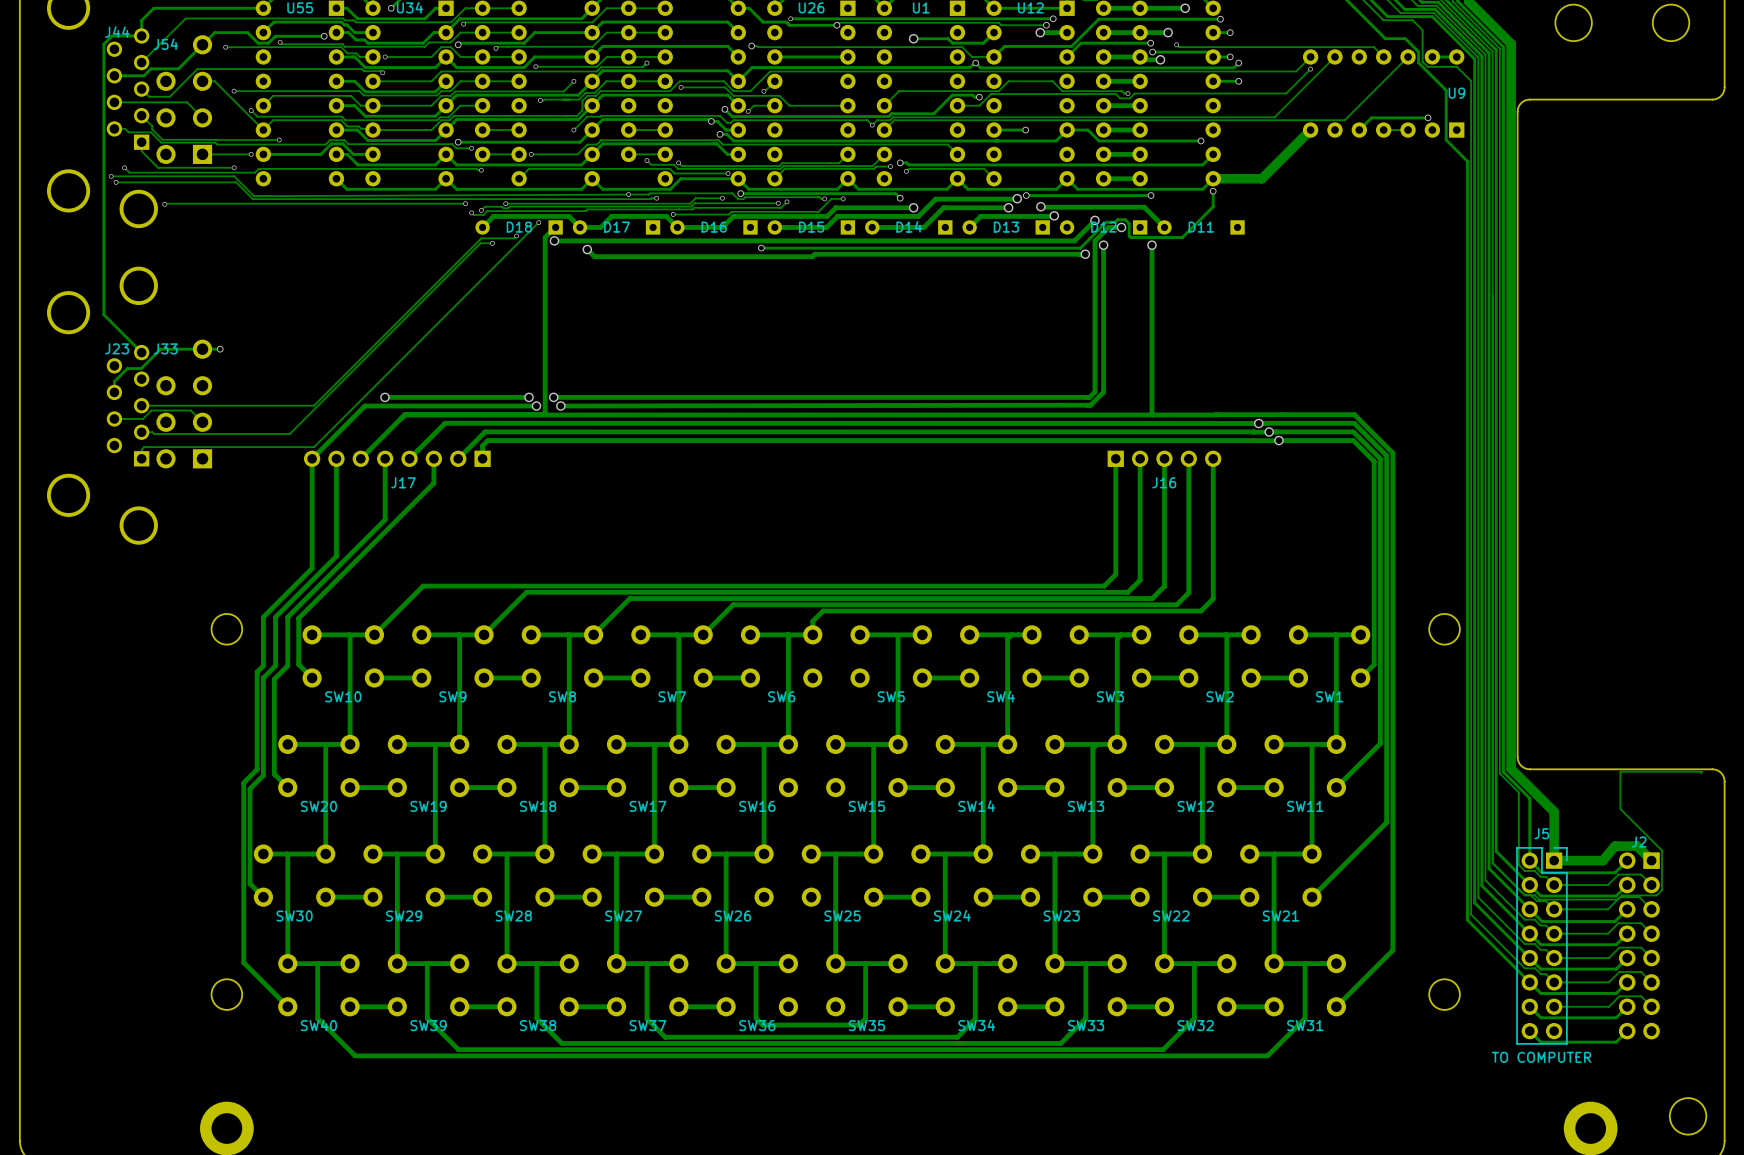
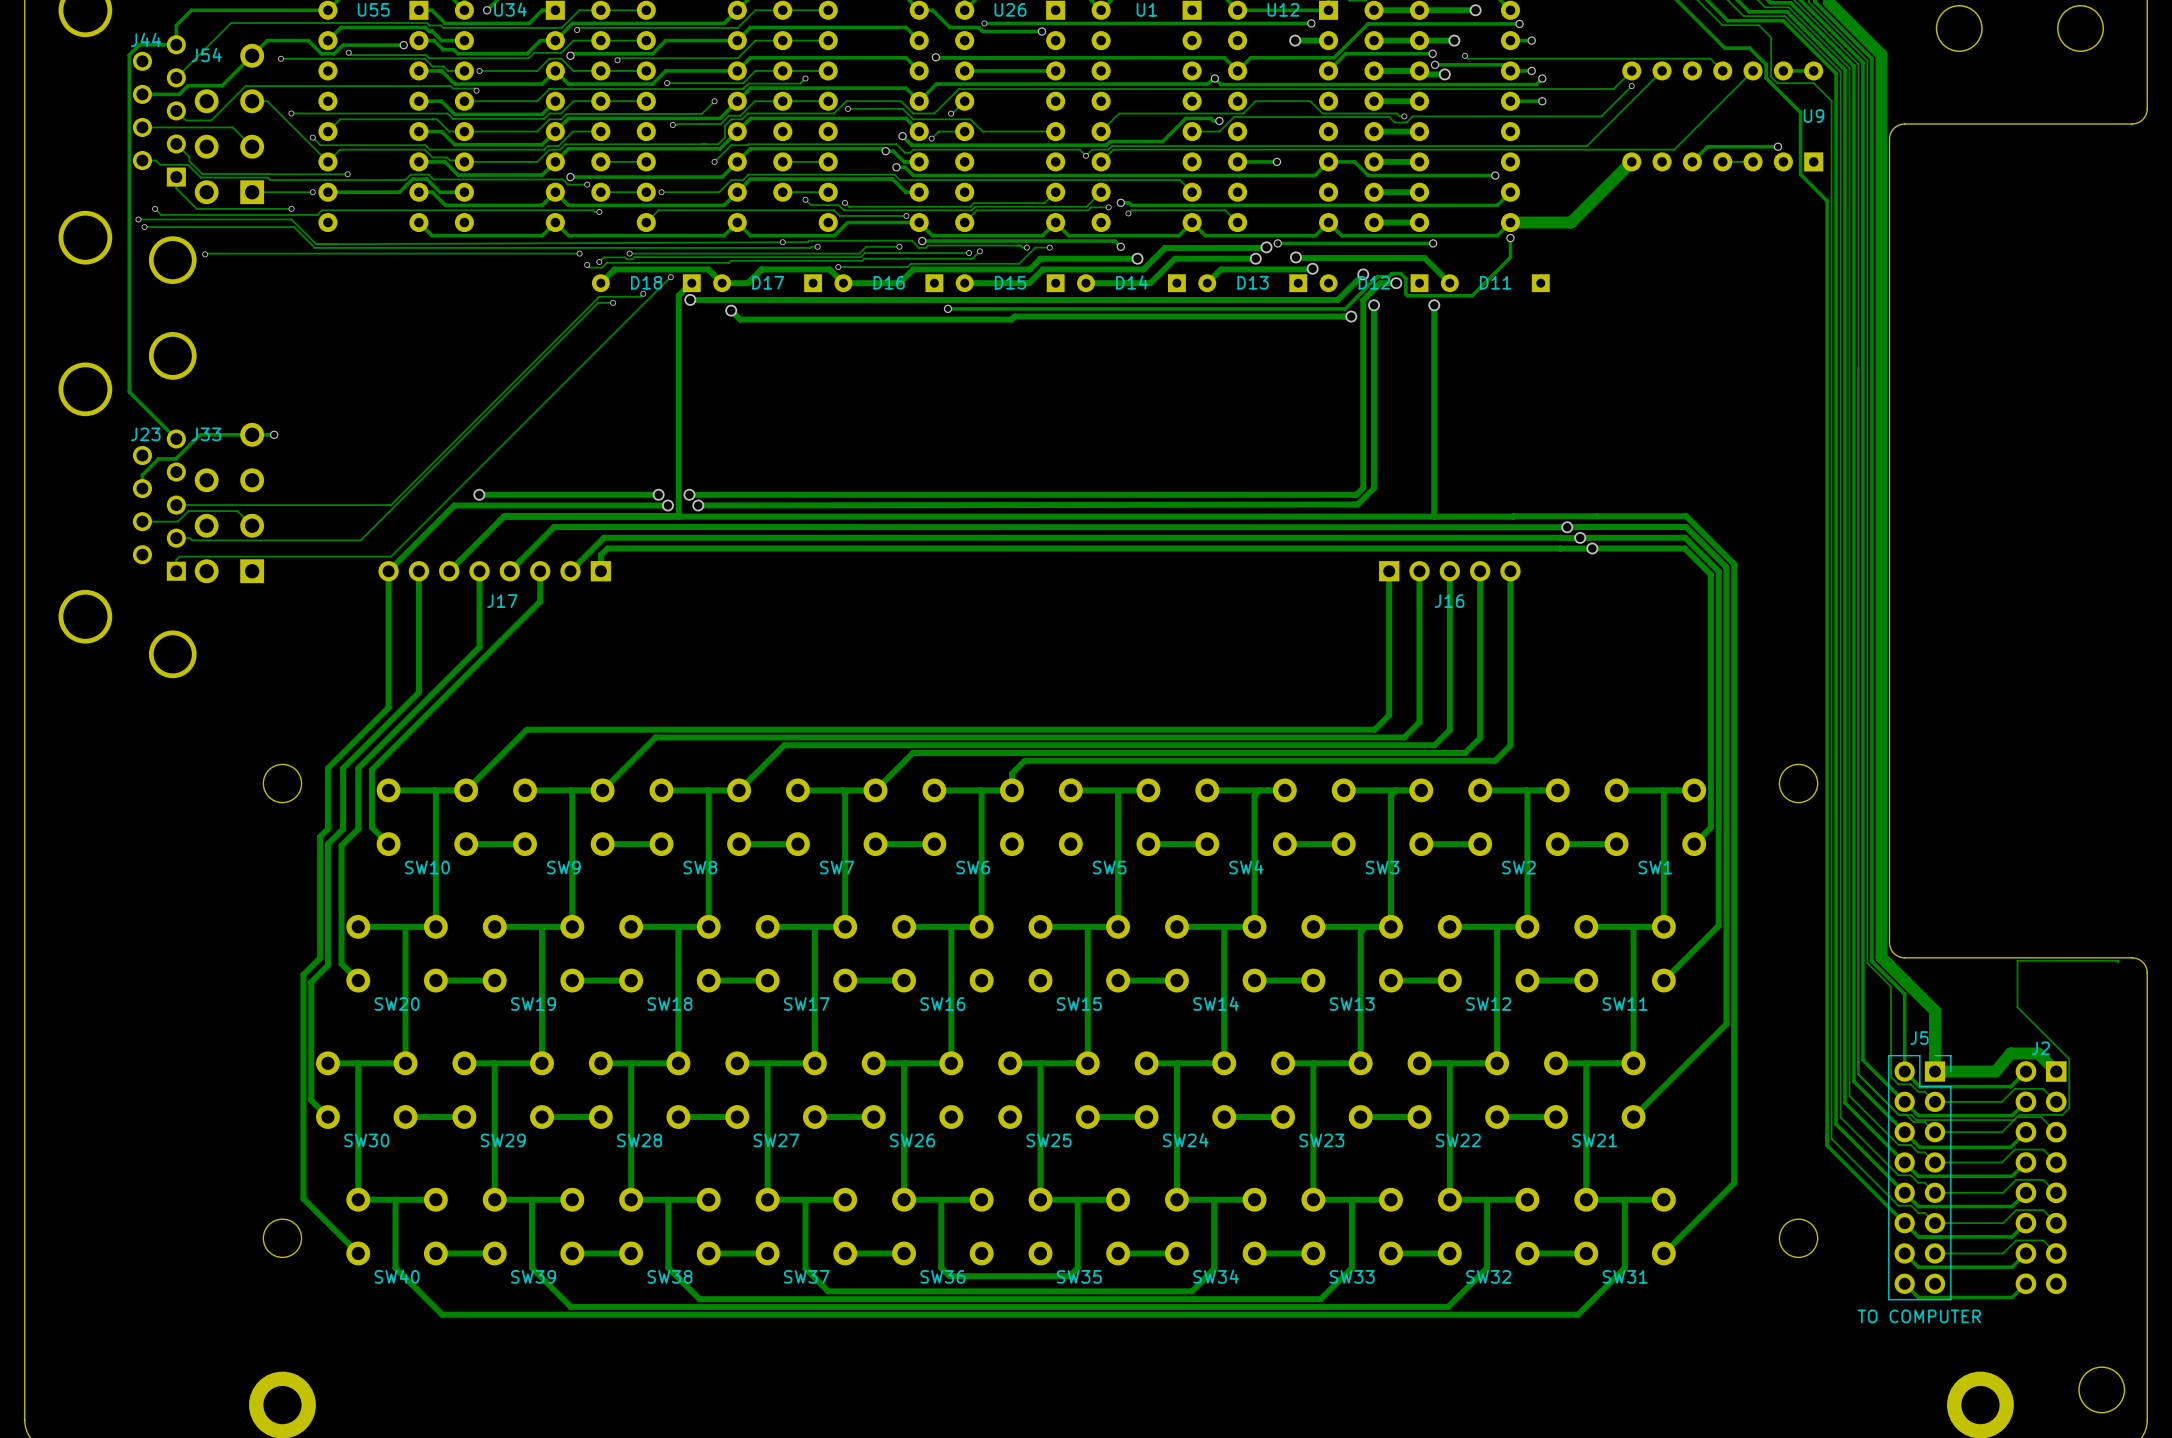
track: (1046, 25) (1001, 25) (998, 22) (839, 22) (836, 25) -> none
via: (1046, 25) -> none
track: (994, 32) (983, 43) (952, 43) (948, 38) (913, 38) -> none
via: (913, 38) -> none
track: (838, 47) (962, 47) (972, 56) (994, 56) -> (935, 57) (1224, 57) (1237, 70)

